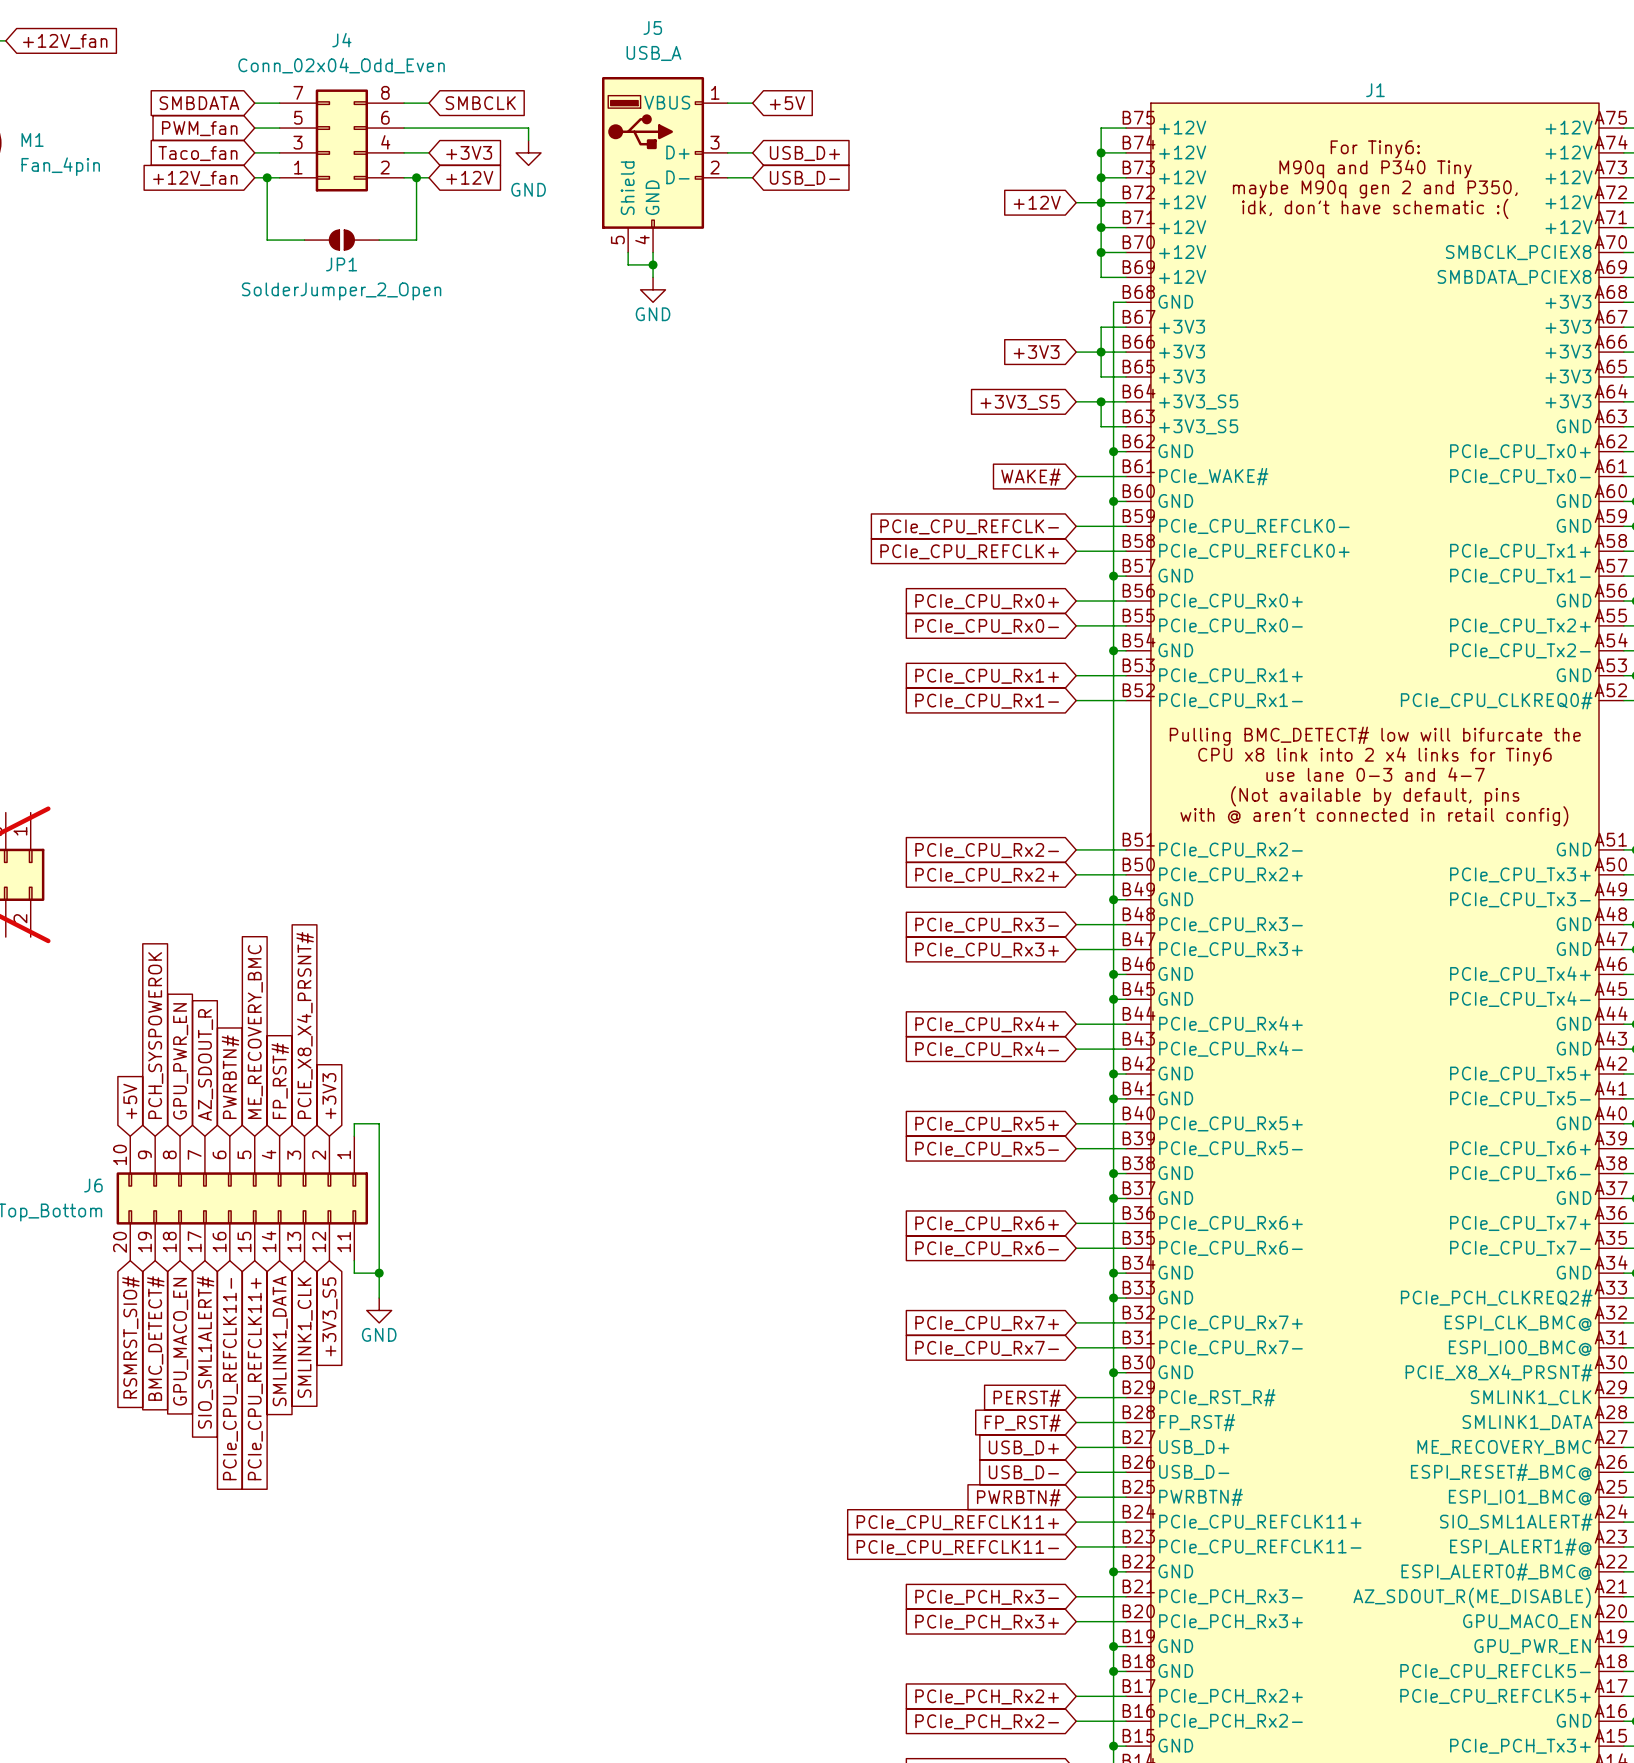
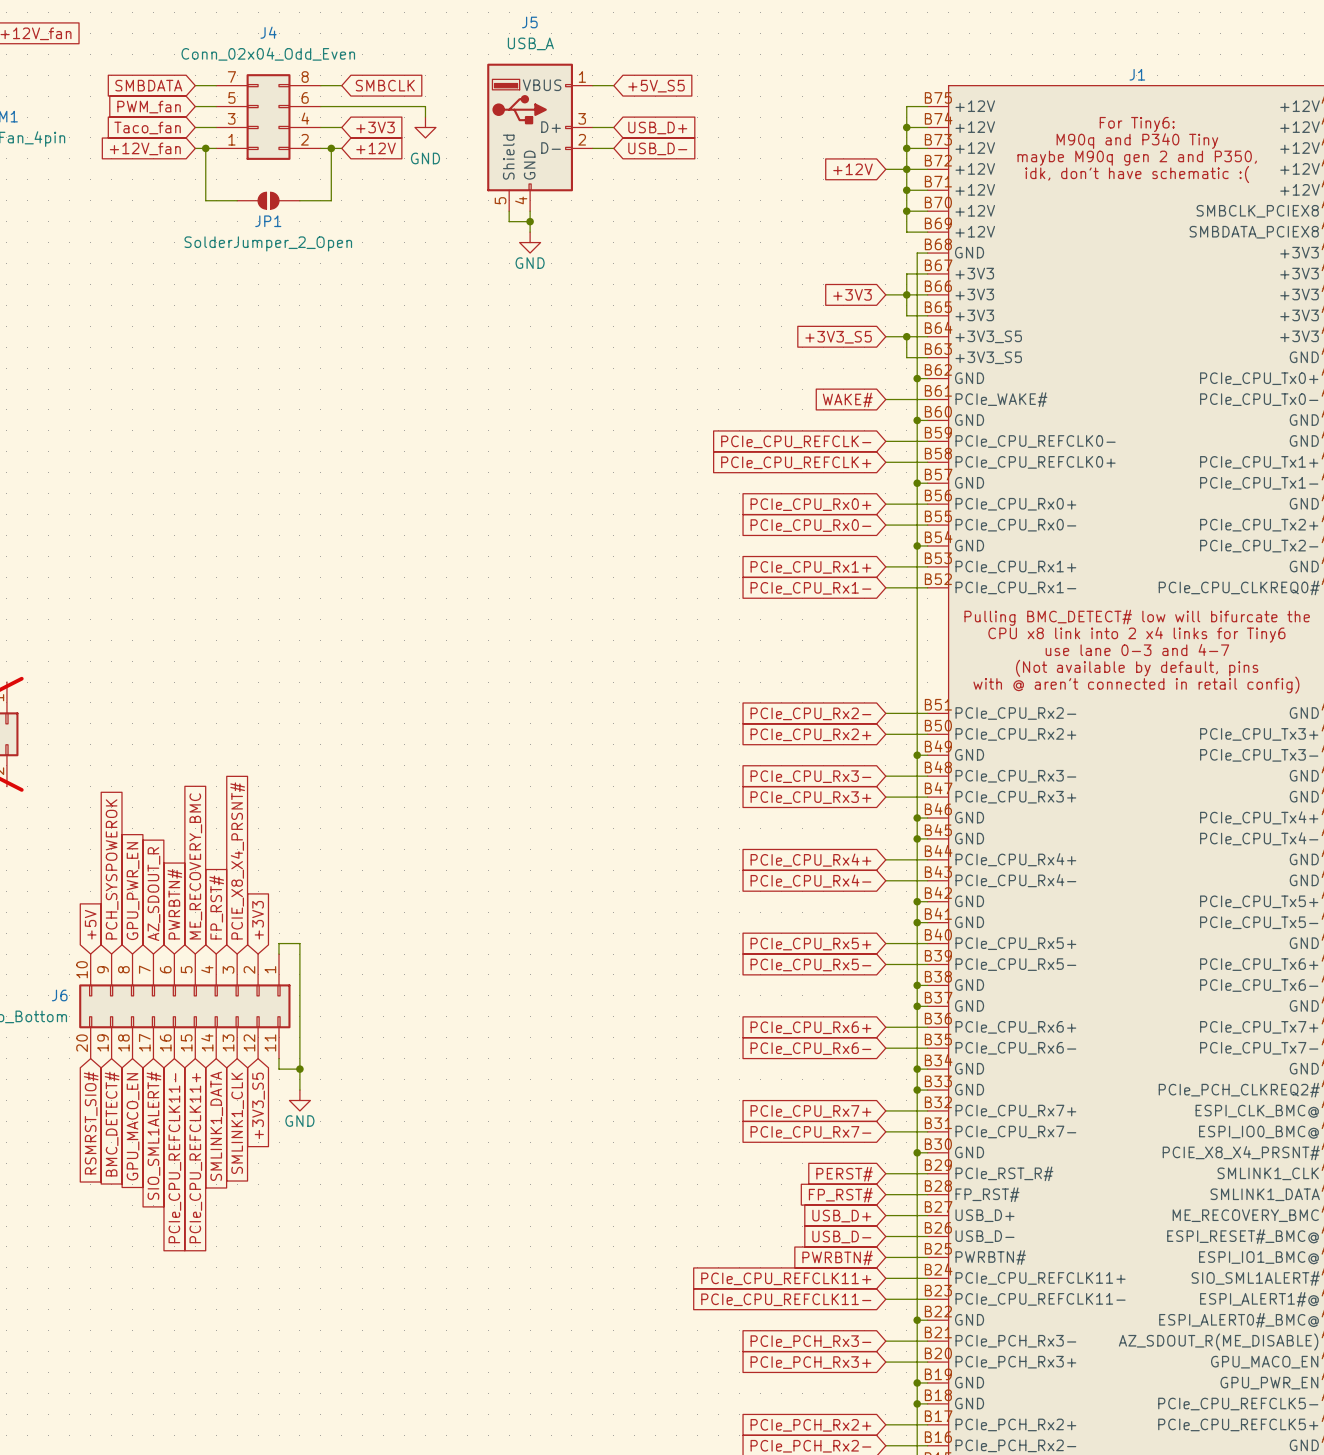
global label: +5V (787, 103) -> +5V_S5 (656, 86)

